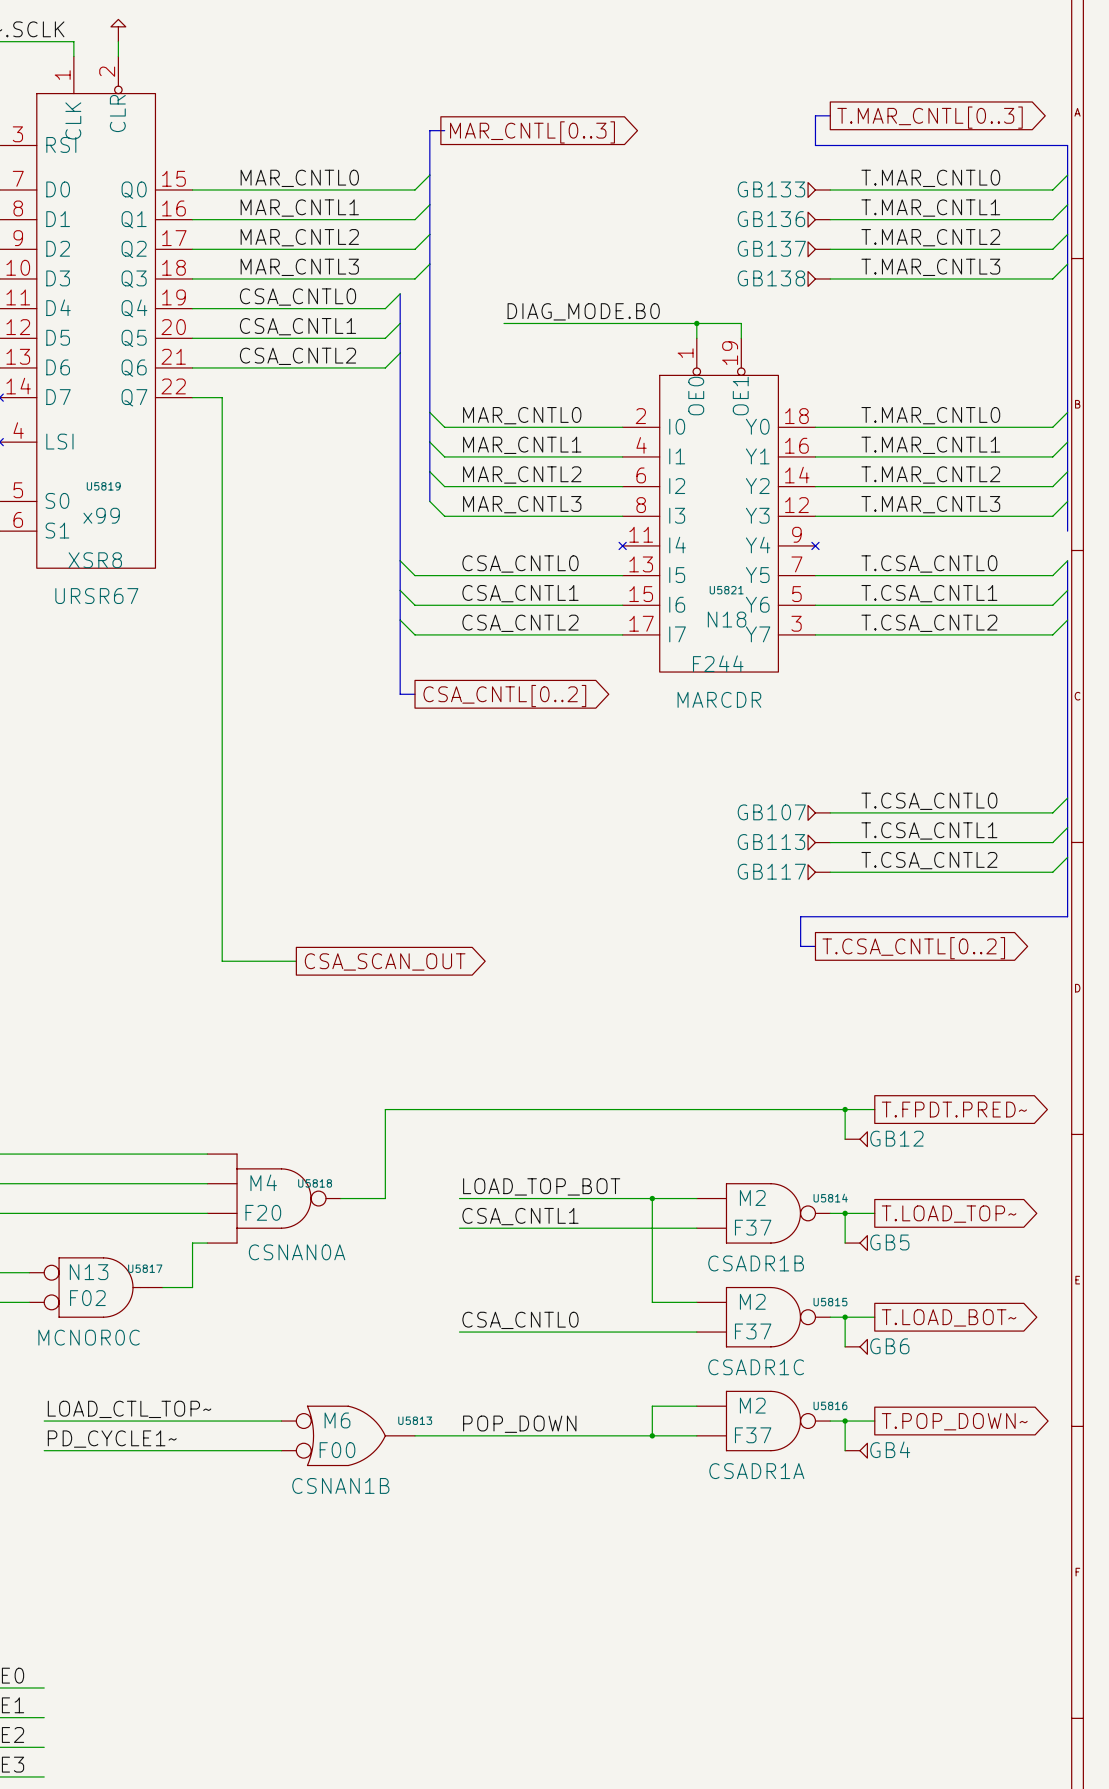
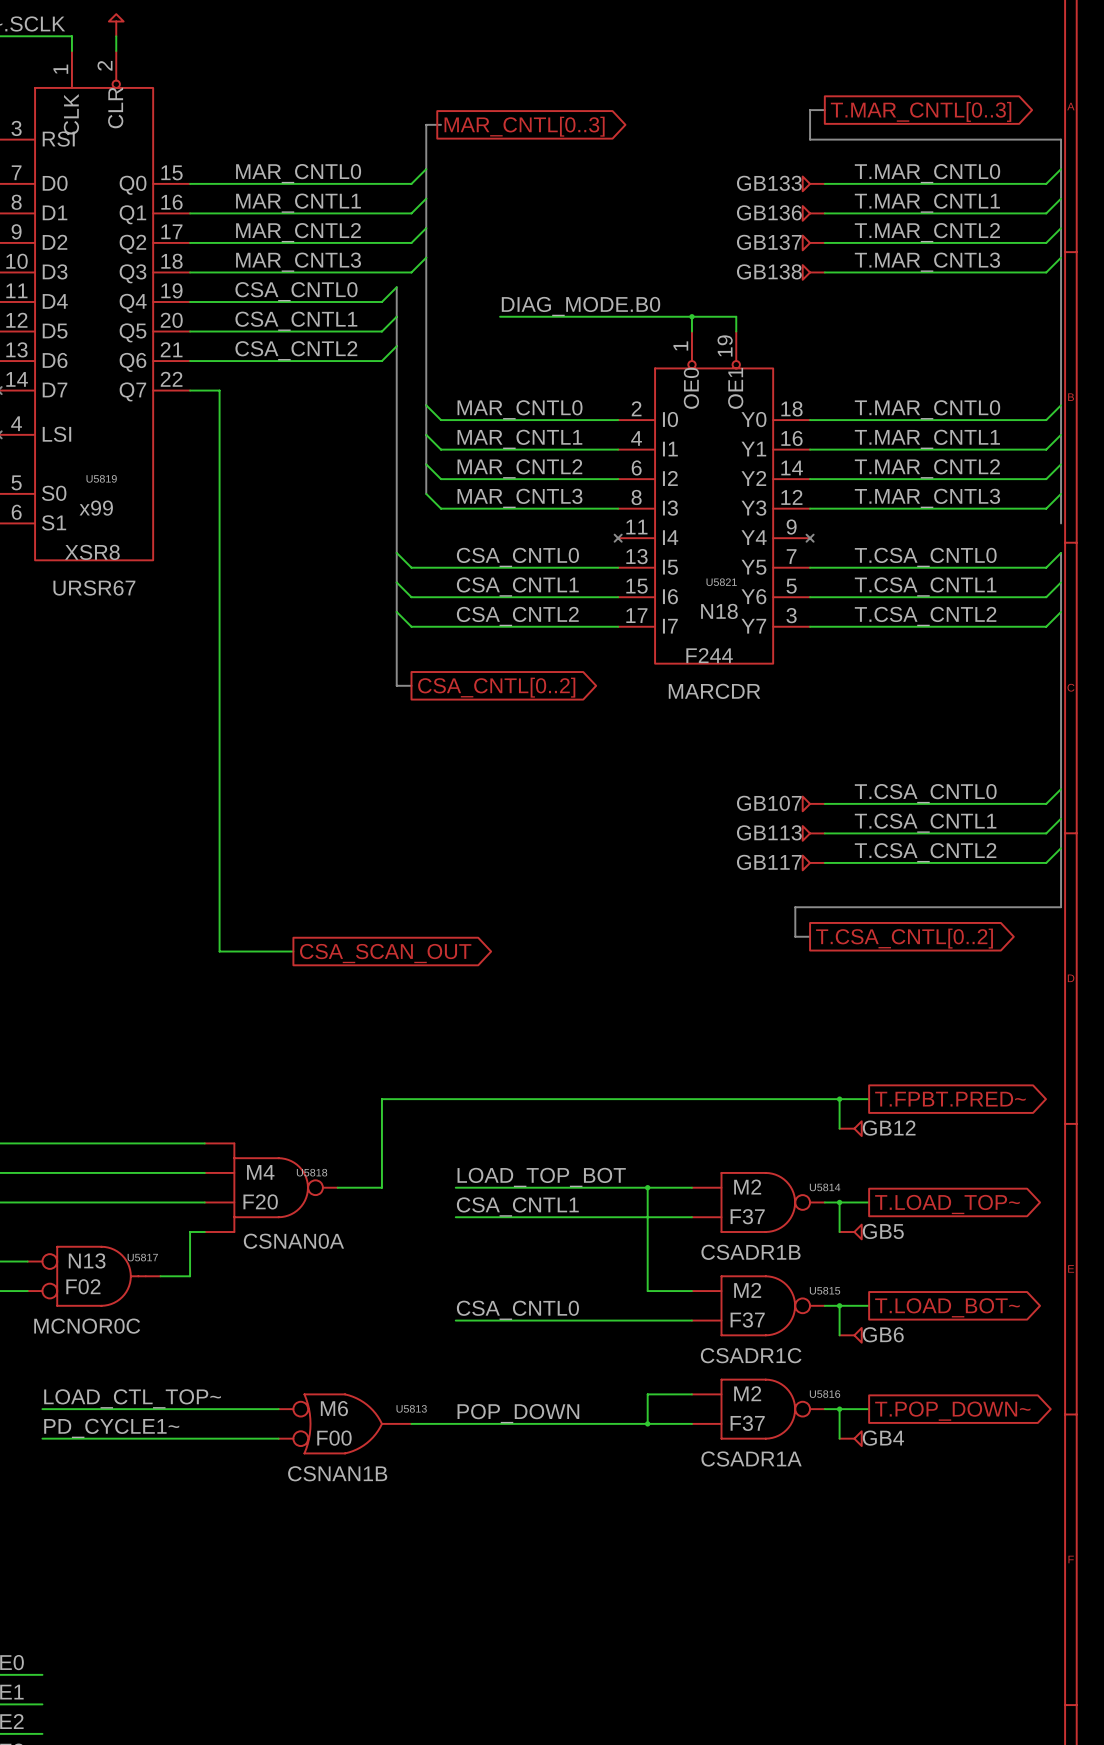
global label: T.FPDT.PRED~ (954, 1109) -> T.FPBT.PRED~ (950, 1099)

